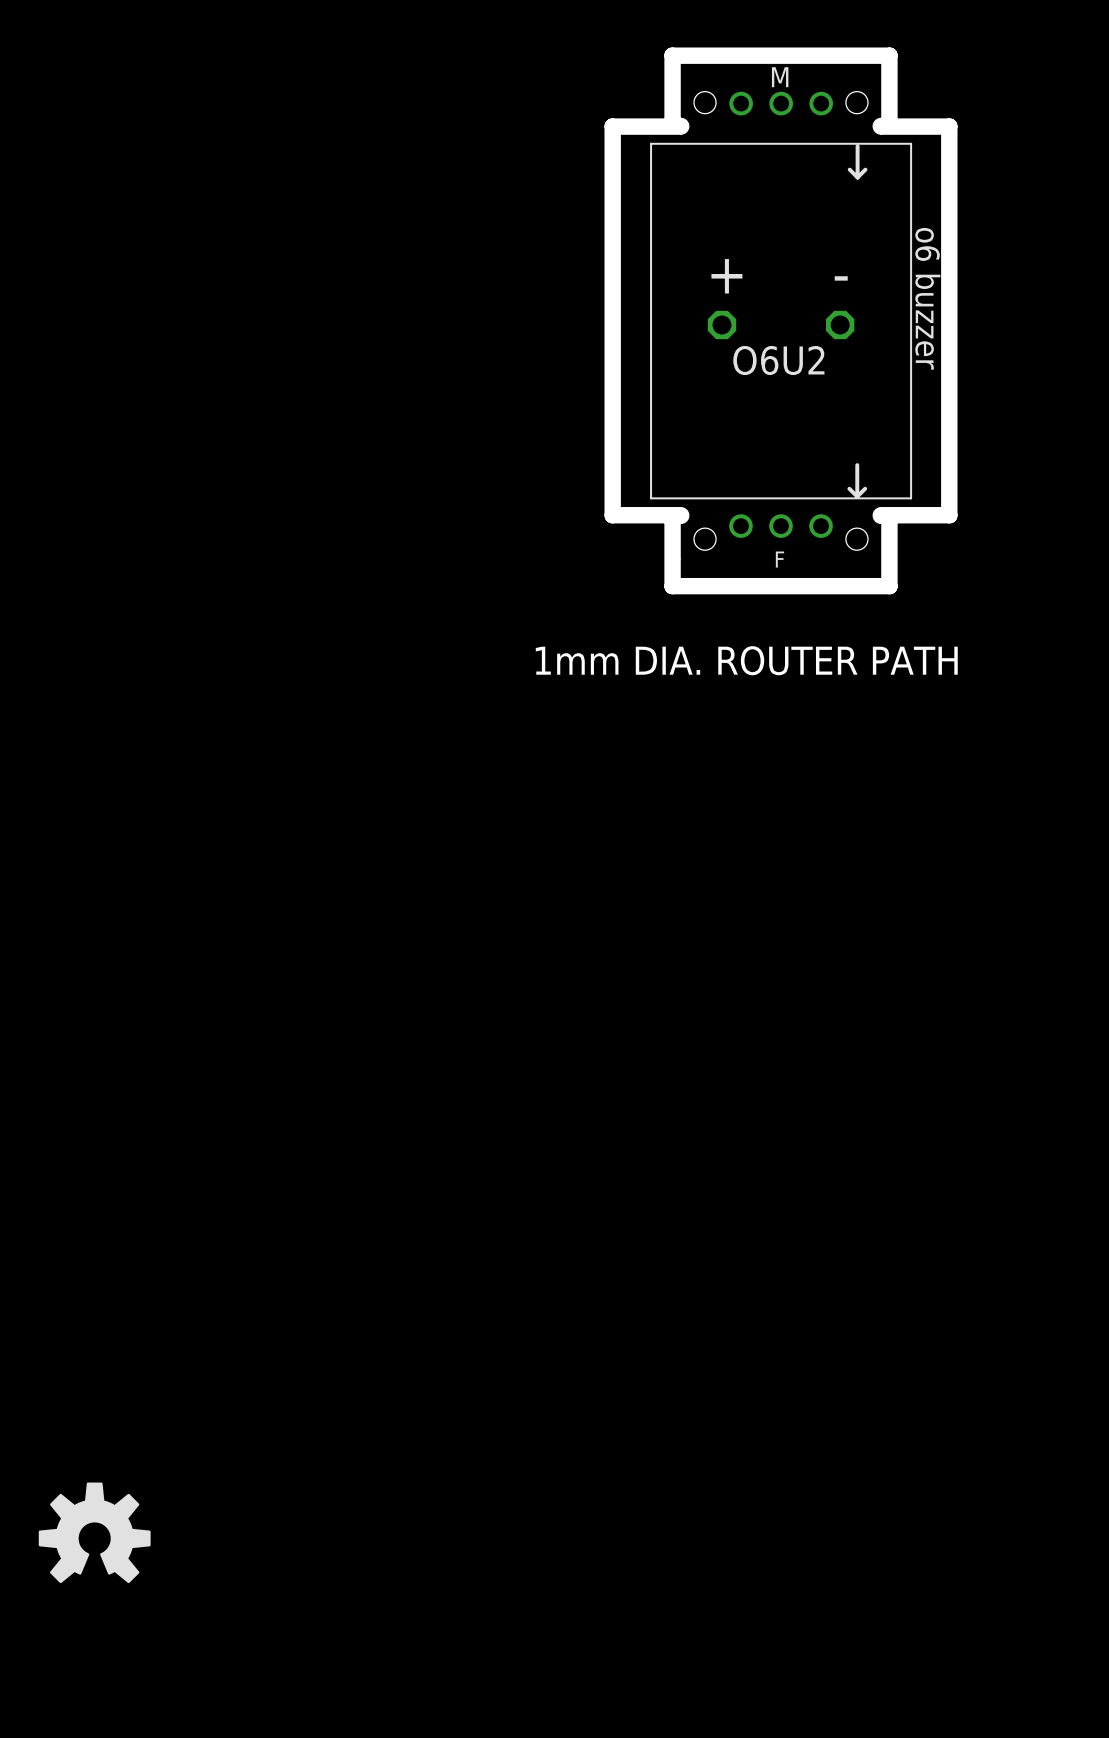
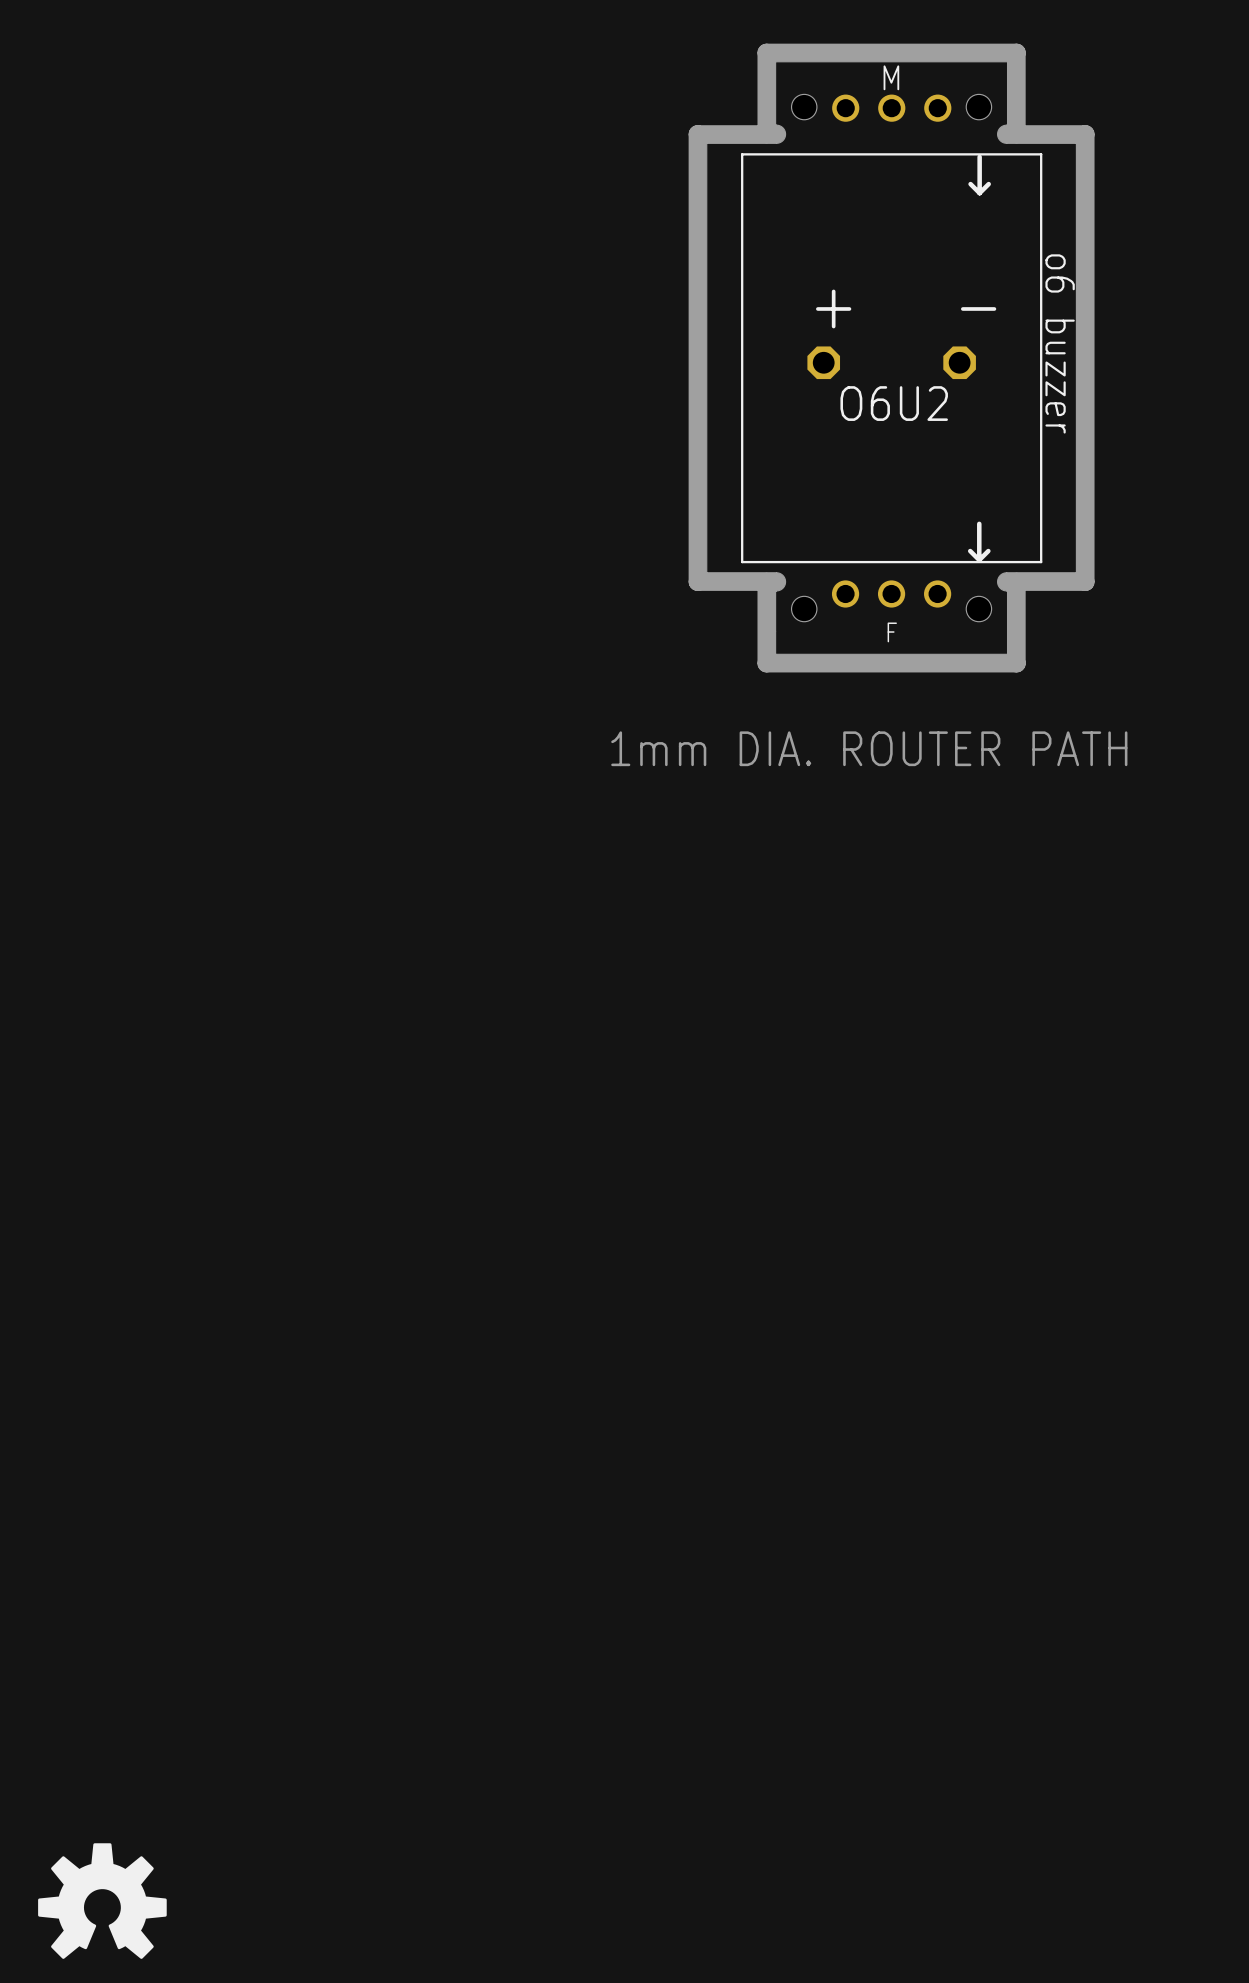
drawing position: (94, 1532) -> (102, 1901)

